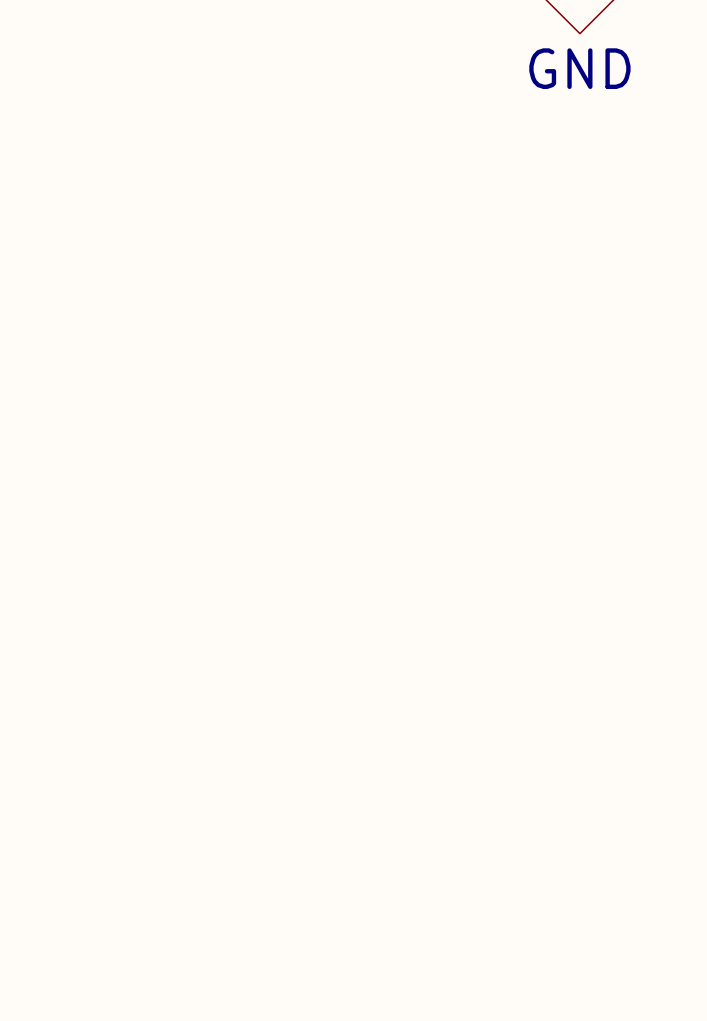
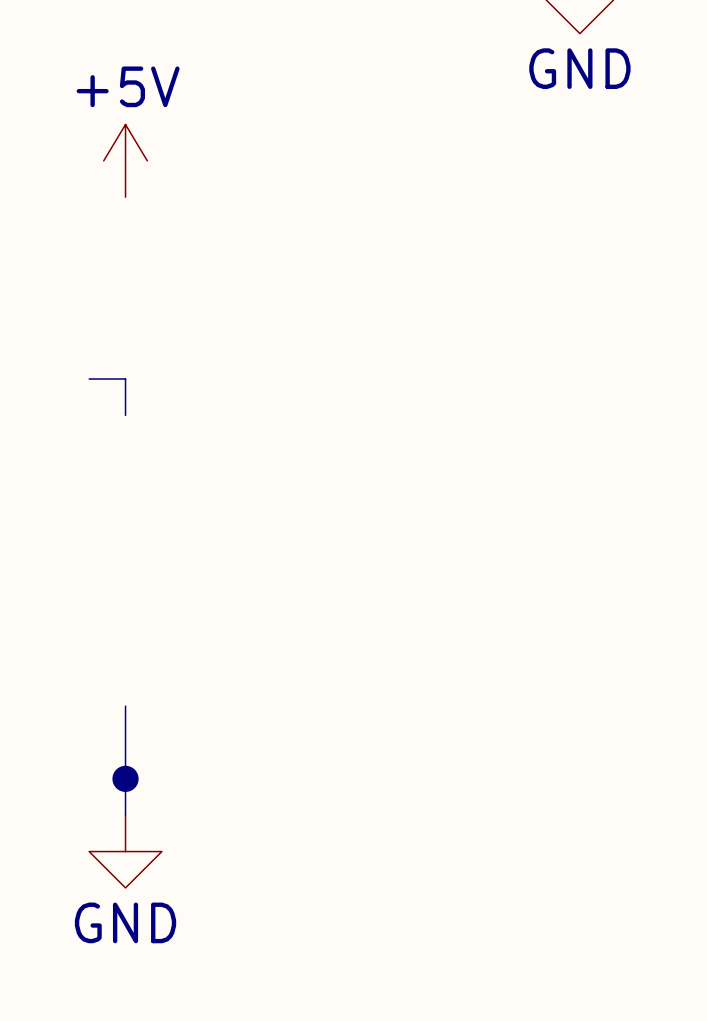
power symbol: none -> +5V (125, 160)
wire: none -> (89, 378) (125, 378) (125, 415)
wire: none -> (125, 706) (125, 815)
junction: none -> (125, 778)
power symbol: none -> GND (125, 851)

